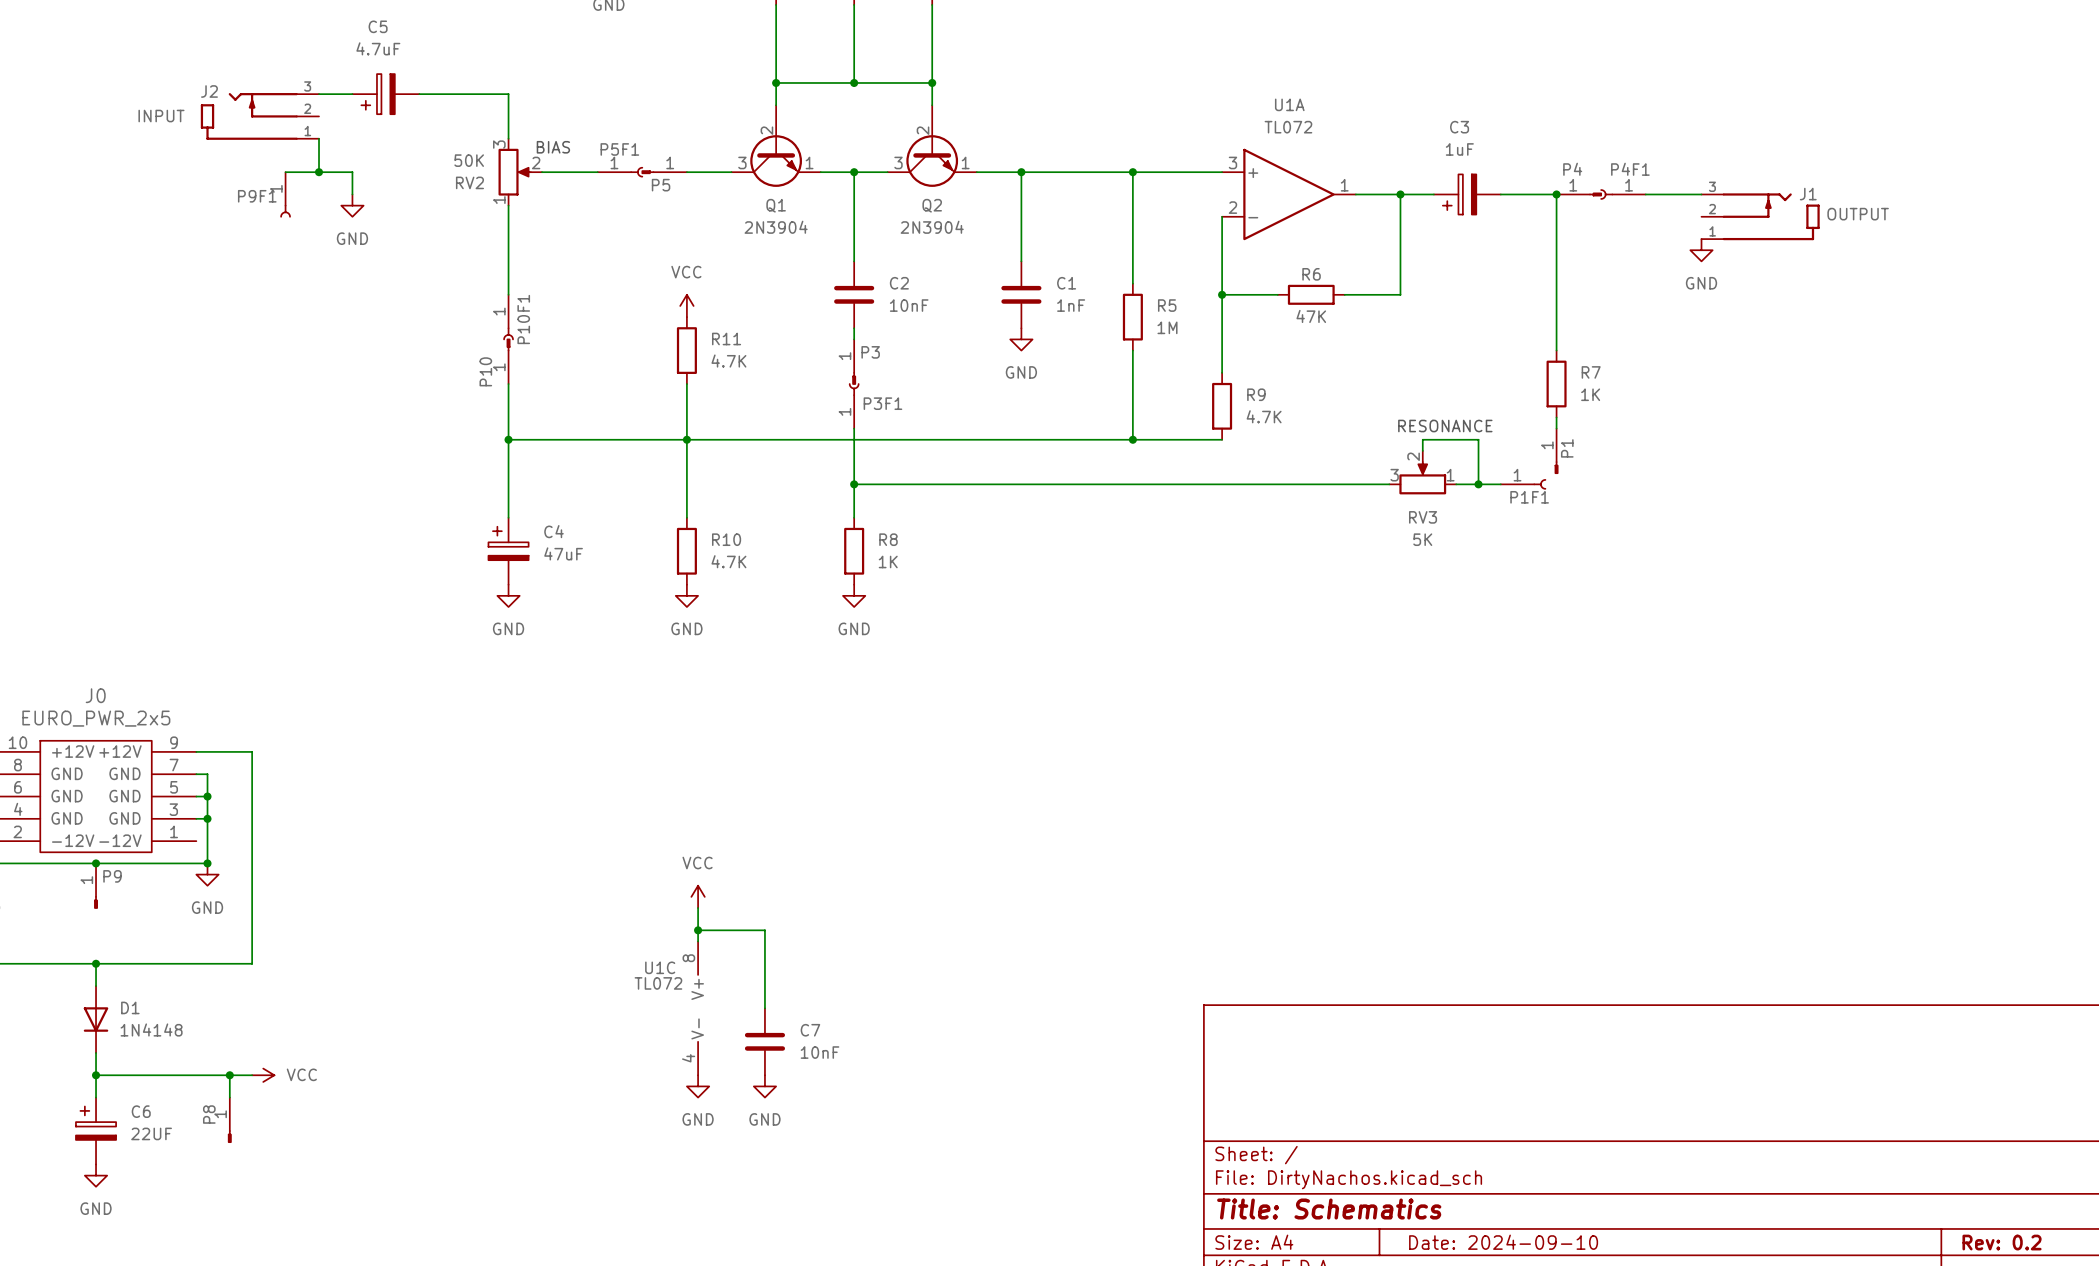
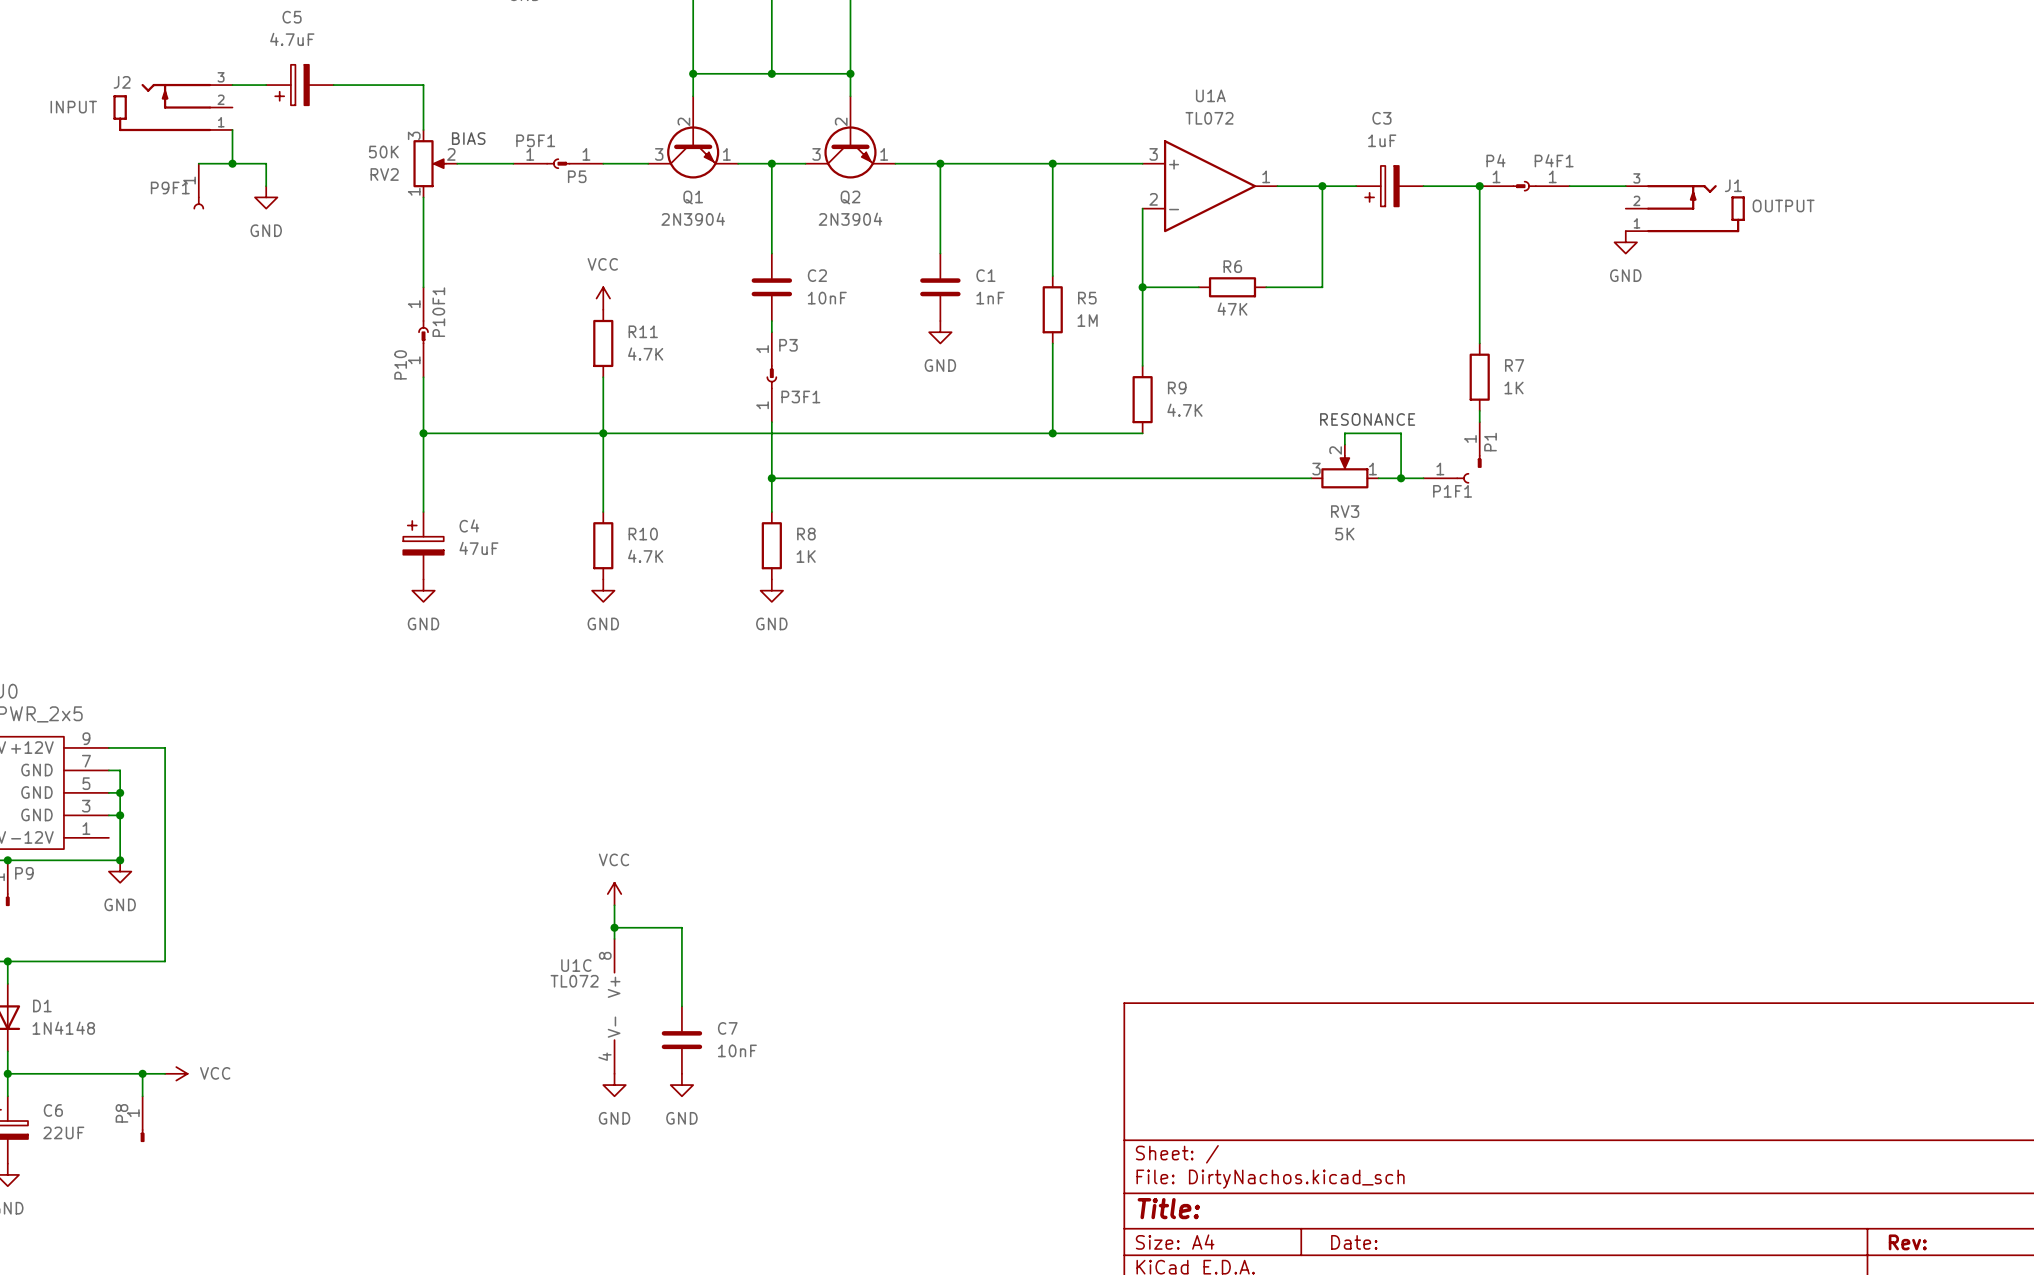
title block: Title: Schematics (1329, 1209) -> Title: (1168, 1208)
title block: Date: 2024-09-10 (1503, 1242) -> Date: (1354, 1242)
title block: Rev: 0.2 (2002, 1242) -> Rev: (1907, 1242)

